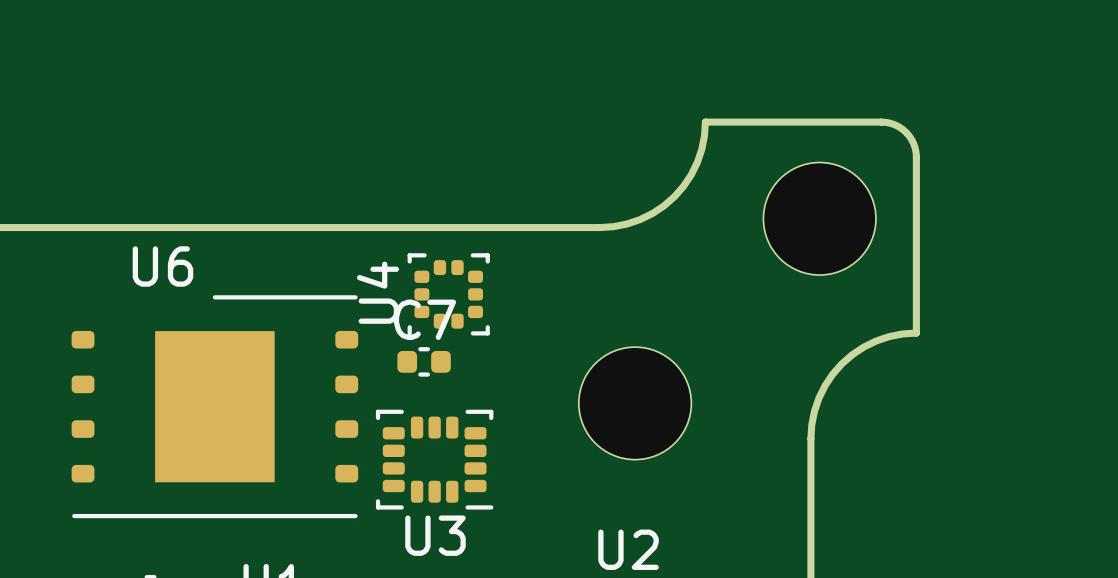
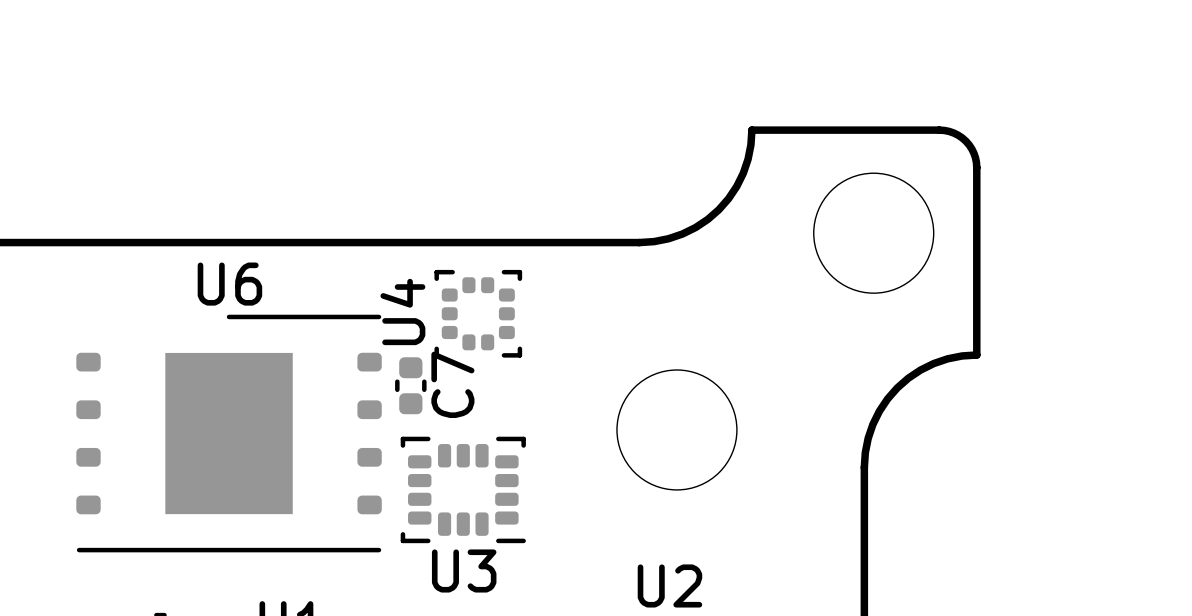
U6 name position: U6 (162, 266) -> U6 (229, 284)
C7 rotation: 0° (424, 361) -> 90° clockwise (410, 385)
C7 position: (424, 361) -> (410, 385)

